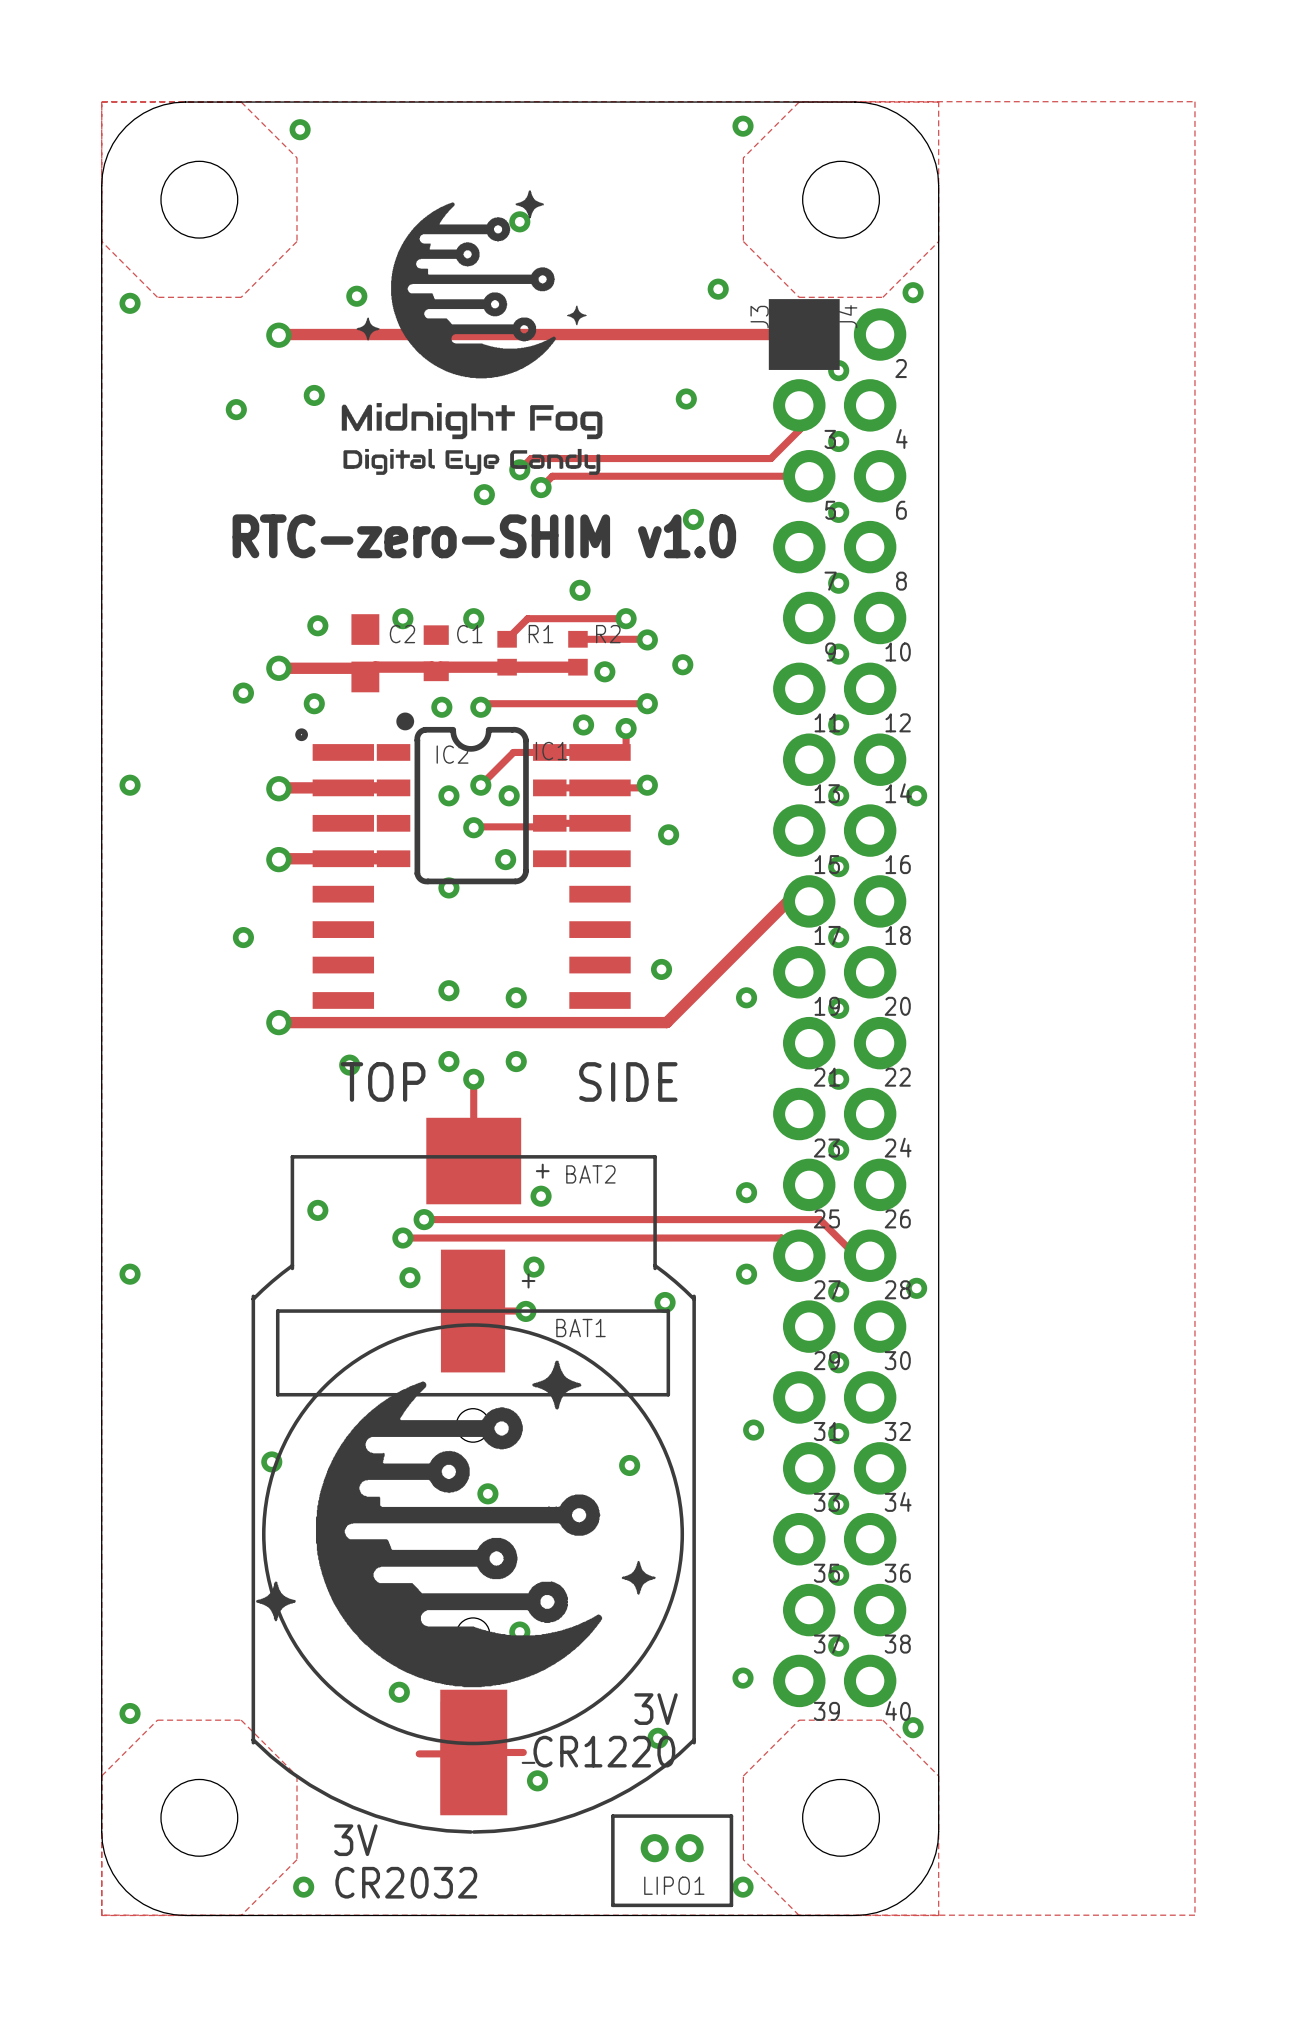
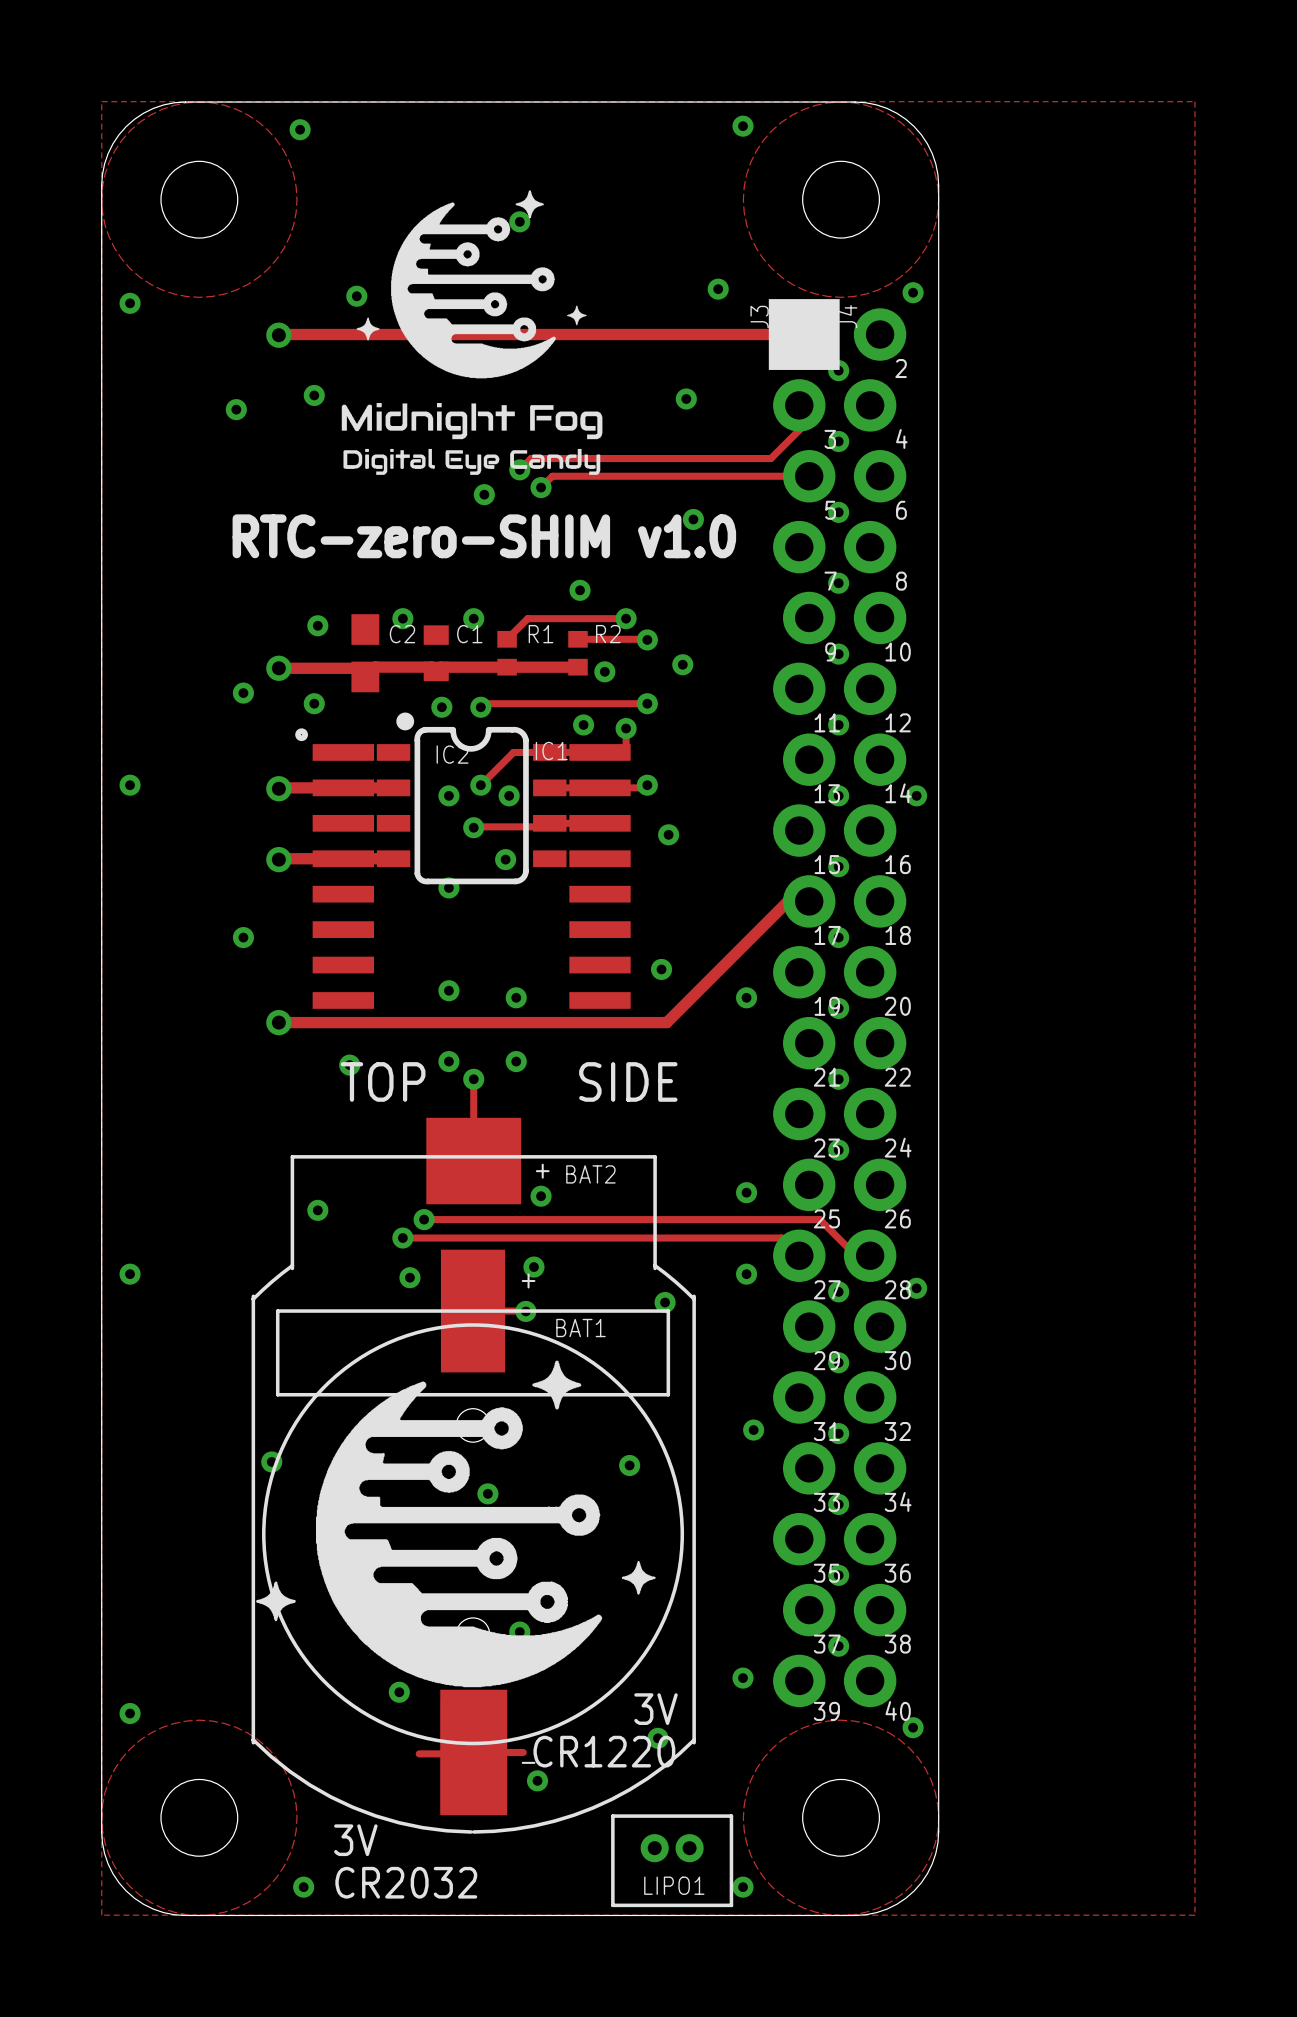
zone outline: (101, 102) (241, 102) (296, 157) (296, 241) (241, 297) (157, 297) (101, 241) -> none
zone outline: none -> (199, 102) (174, 105) (161, 109) (150, 115) (130, 130) (121, 140) (109, 162) (102, 186) (101, 199) (102, 212) (109, 237) (121, 259) (130, 268) (139, 277) (161, 289) (174, 294) (199, 297) (224, 294) (236, 289) (258, 277) (268, 268) (276, 259) (289, 237) (296, 212) (296, 199) (296, 186) (289, 162) (276, 140) (268, 130) (248, 115) (236, 109) (224, 105) (199, 102)
zone outline: (799, 102) (938, 102) (938, 241) (882, 297) (799, 297) (743, 241) (743, 157) (799, 102) -> (841, 102) (815, 105) (803, 109) (792, 115) (771, 130) (763, 140) (750, 162) (744, 186) (743, 199) (744, 212) (750, 237) (763, 259) (771, 268) (781, 277) (803, 289) (815, 294) (841, 297) (866, 294) (878, 289) (900, 277) (910, 268) (918, 259) (931, 237) (937, 212) (938, 199) (937, 186) (931, 162) (918, 140) (910, 130) (889, 115) (878, 109) (866, 105) (841, 102)
zone outline: none -> (199, 1720) (174, 1723) (161, 1727) (139, 1740) (130, 1748) (121, 1758) (109, 1780) (102, 1805) (101, 1817) (102, 1830) (109, 1855) (121, 1877) (130, 1886) (139, 1895) (161, 1908) (186, 1914) (199, 1915) (224, 1912) (236, 1908) (248, 1902) (268, 1886) (276, 1877) (289, 1855) (293, 1843) (296, 1817) (296, 1805) (289, 1780) (276, 1758) (268, 1748) (248, 1733) (236, 1727) (224, 1723) (199, 1720)
zone outline: (799, 1720) (882, 1720) (938, 1775) (938, 1915) (799, 1915) (743, 1859) (743, 1775) (799, 1720) -> (841, 1720) (828, 1721) (803, 1727) (781, 1740) (771, 1748) (763, 1758) (750, 1780) (744, 1805) (743, 1817) (744, 1830) (750, 1855) (756, 1866) (771, 1886) (781, 1895) (803, 1908) (828, 1914) (841, 1915) (853, 1914) (878, 1908) (900, 1895) (910, 1886) (918, 1877) (931, 1855) (937, 1830) (938, 1817) (937, 1805) (931, 1780) (925, 1769) (910, 1748) (900, 1740) (878, 1727) (866, 1723) (841, 1720)
zone outline: (101, 1775) (157, 1720) (241, 1720) (296, 1775) (296, 1859) (241, 1915) (101, 1915) -> none

